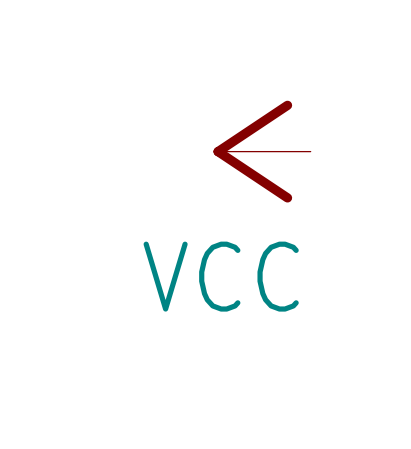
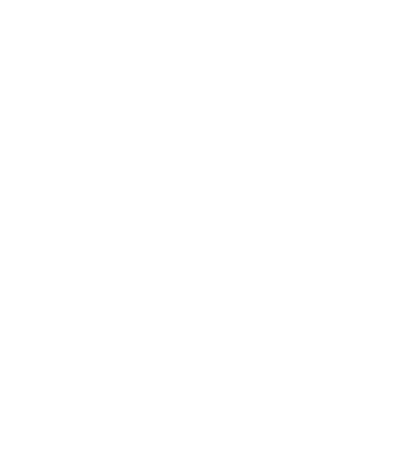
power symbol: VCC (262, 151) -> none

